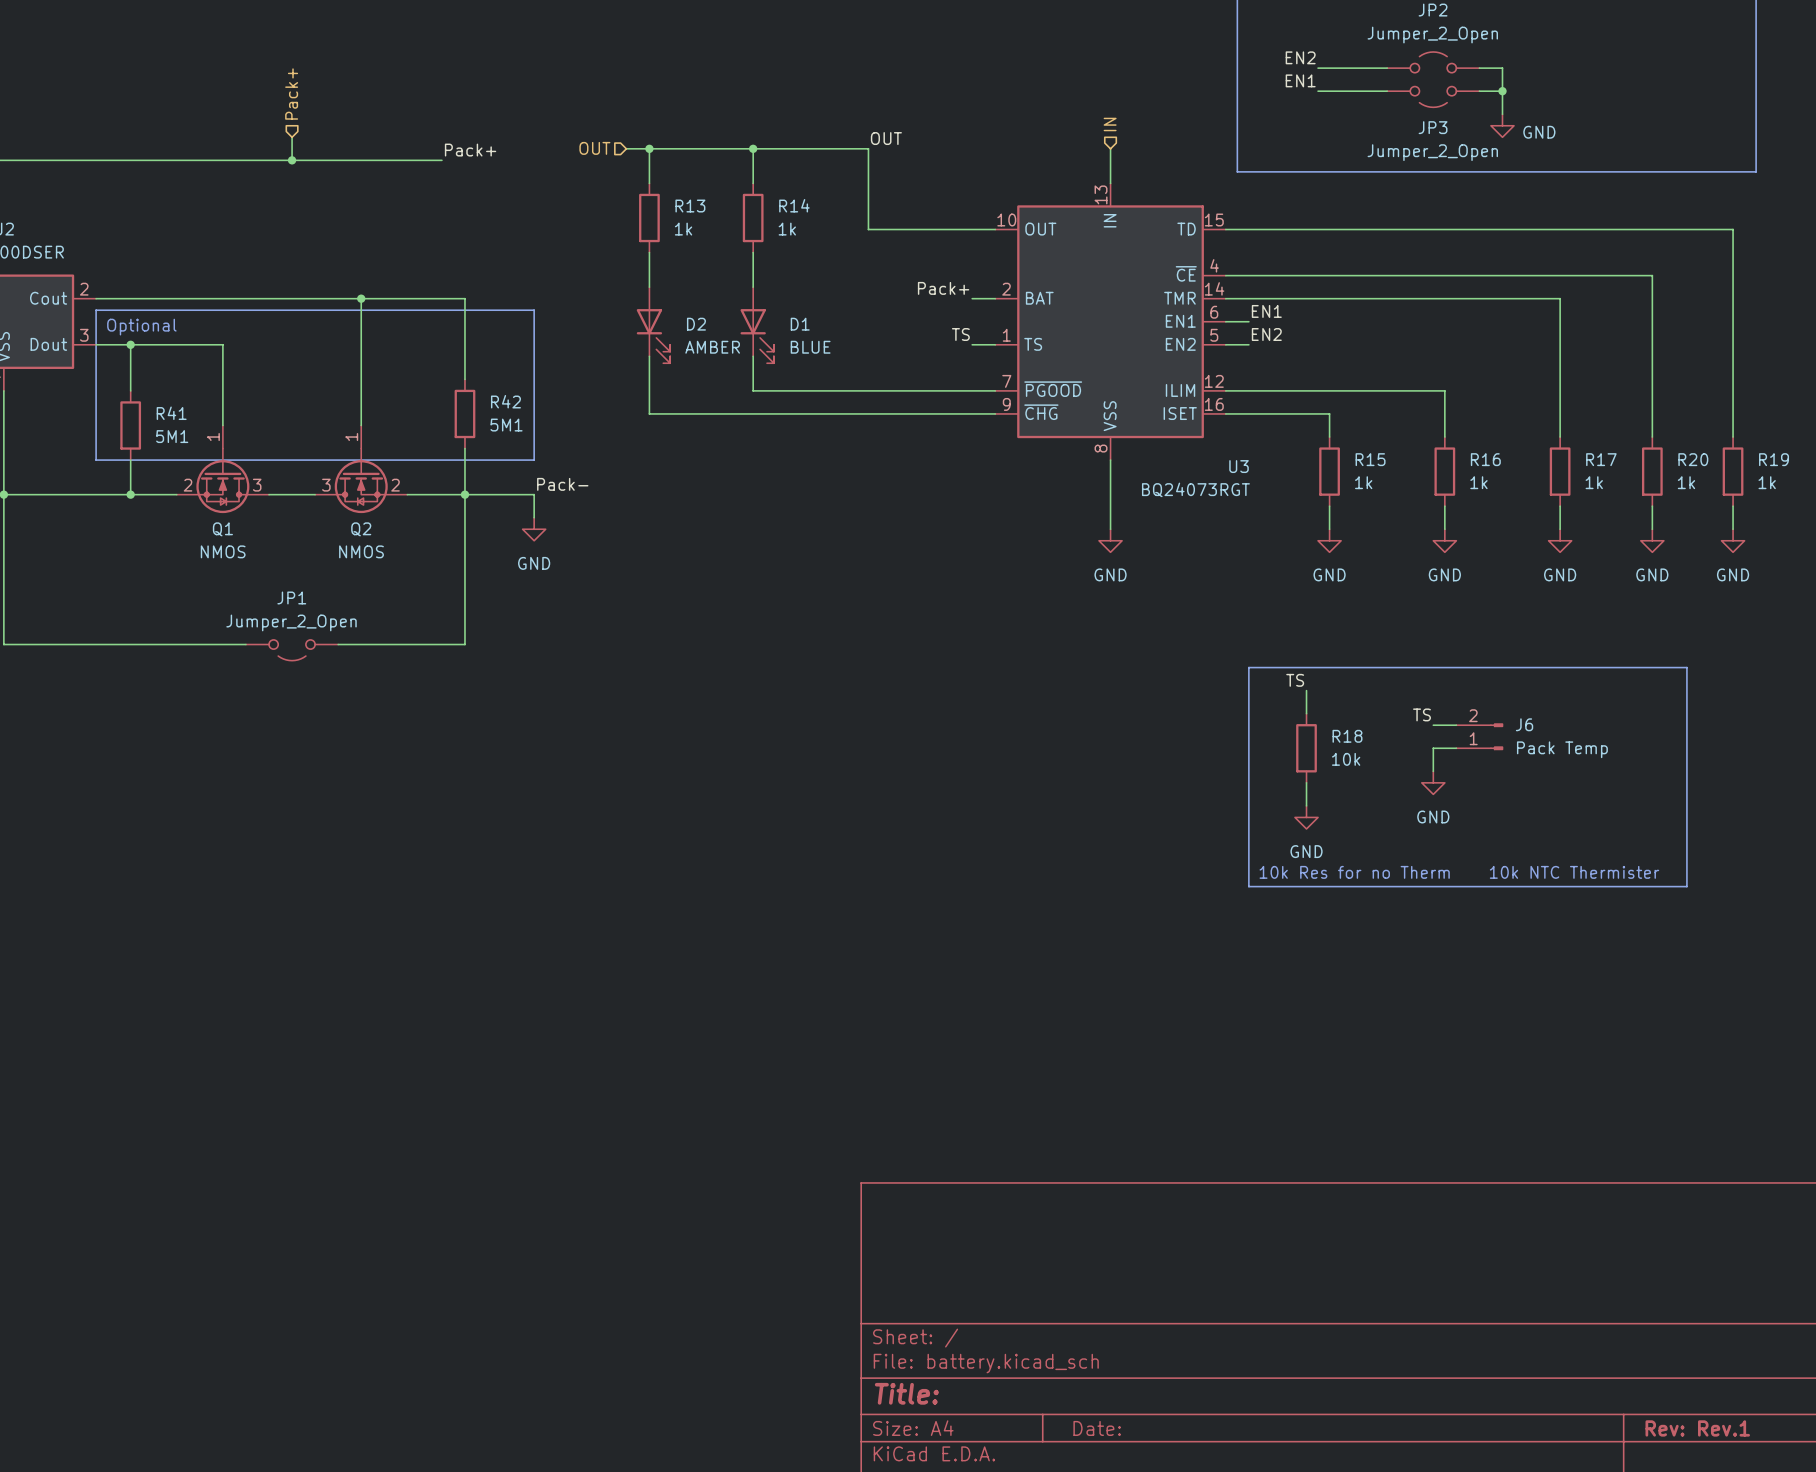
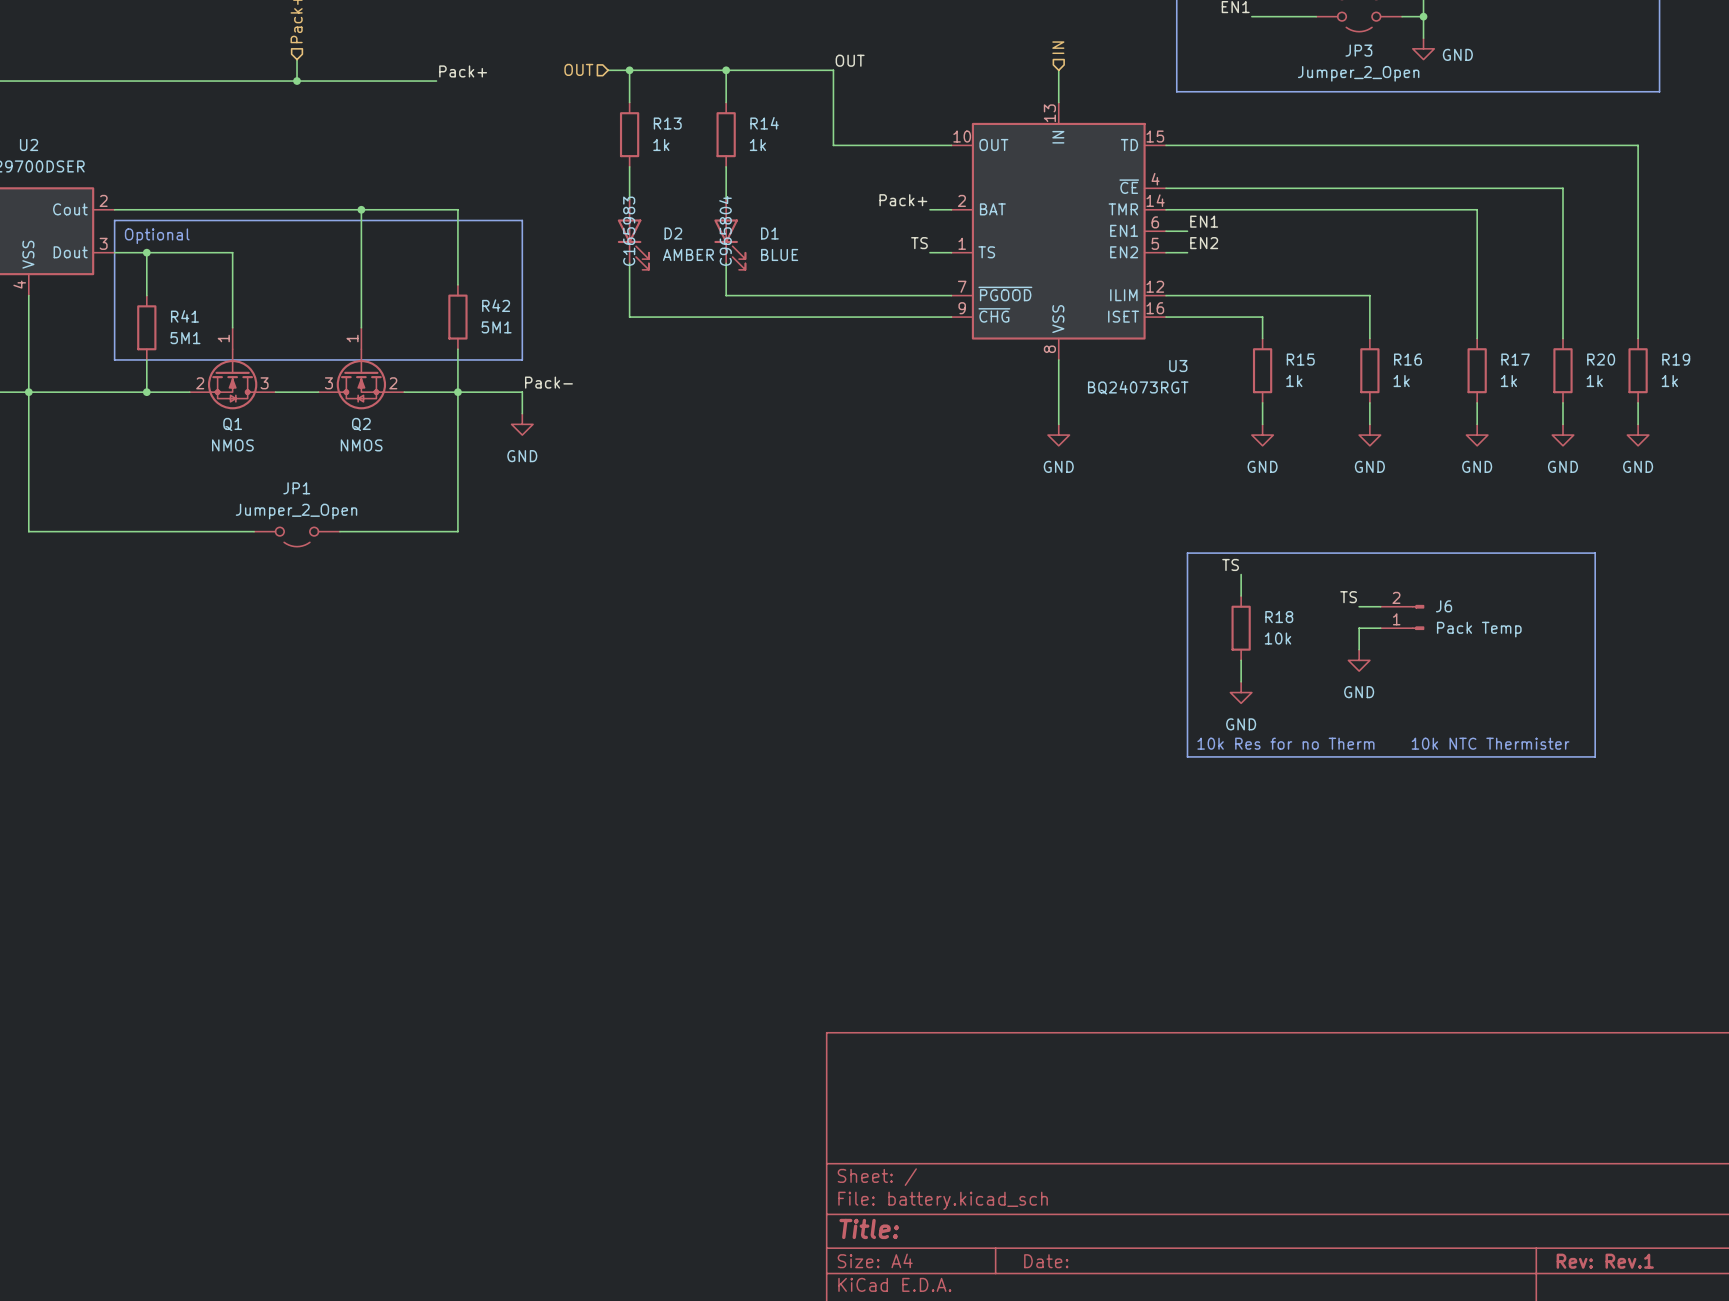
D2 text: none -> C165983 (629, 231)
D1 text: none -> C965804 (725, 230)

